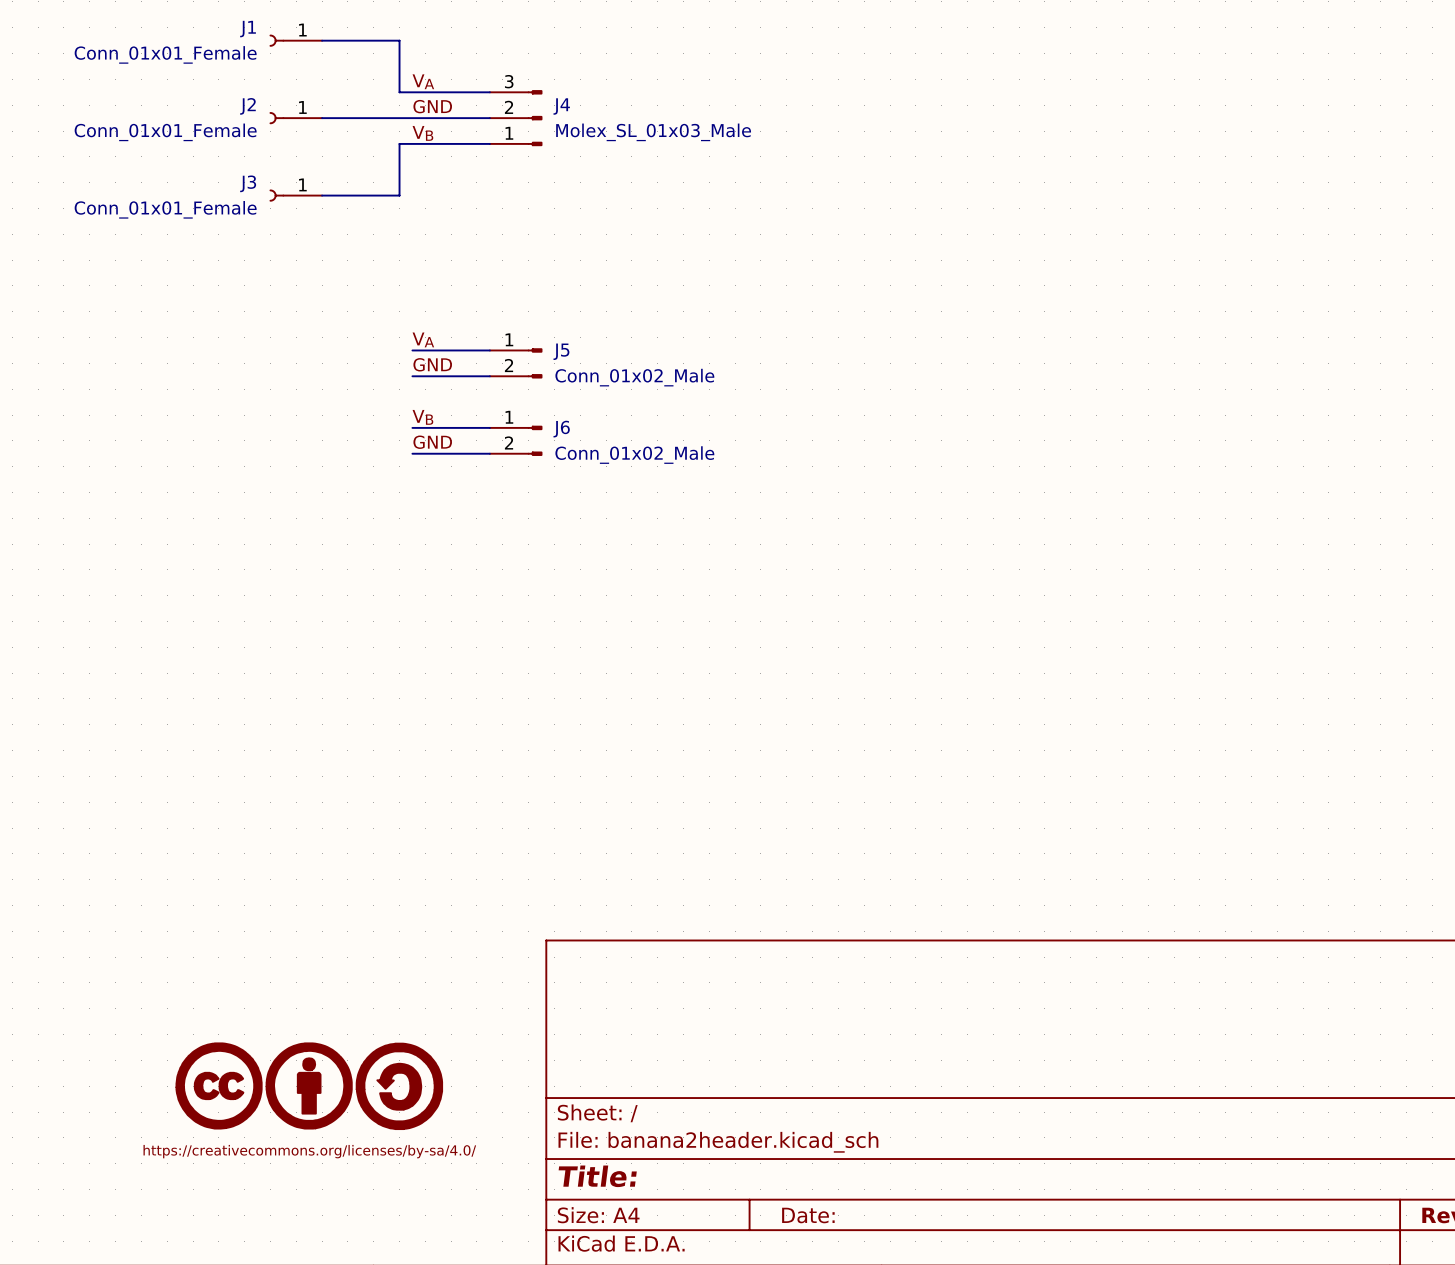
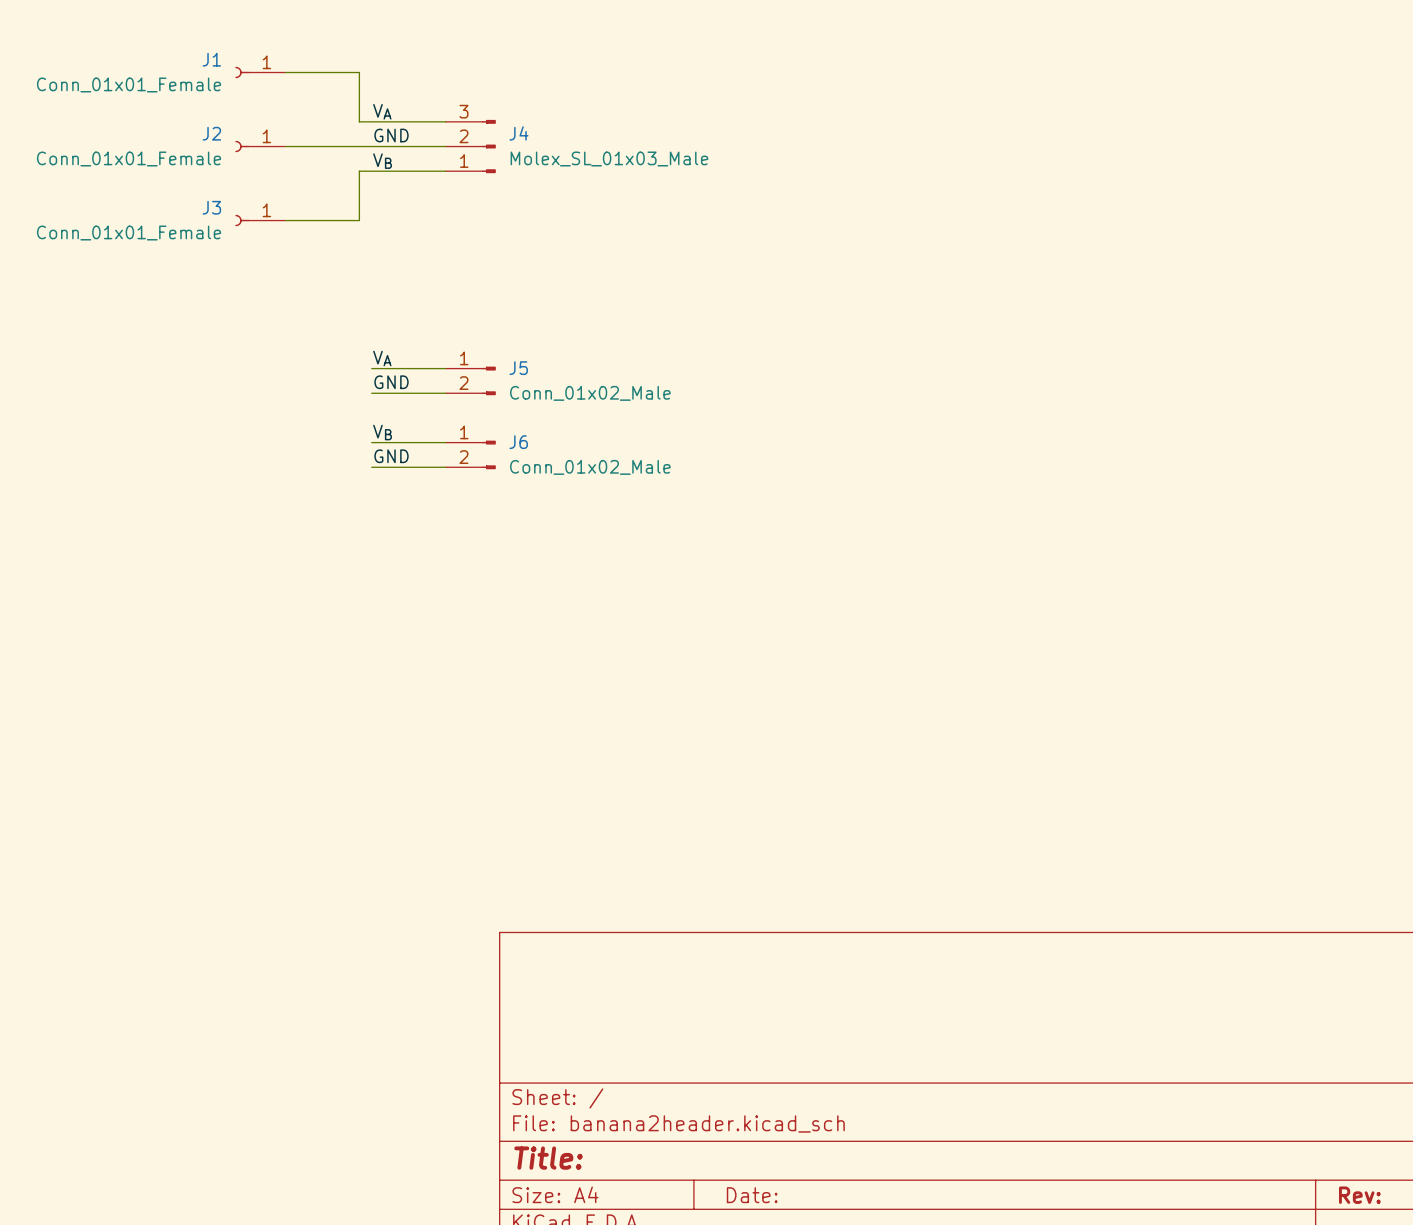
part: (309, 1086) -> none

